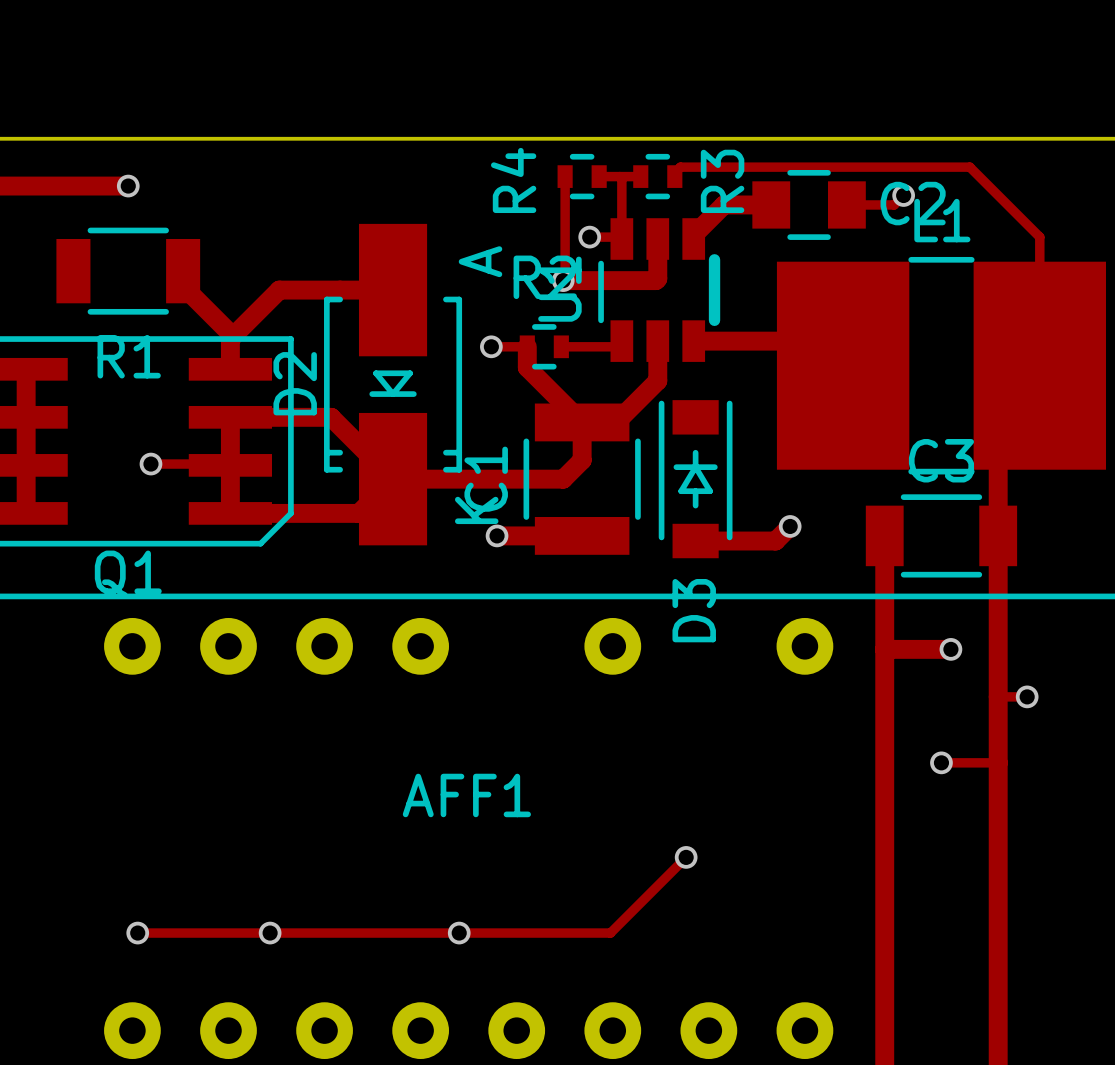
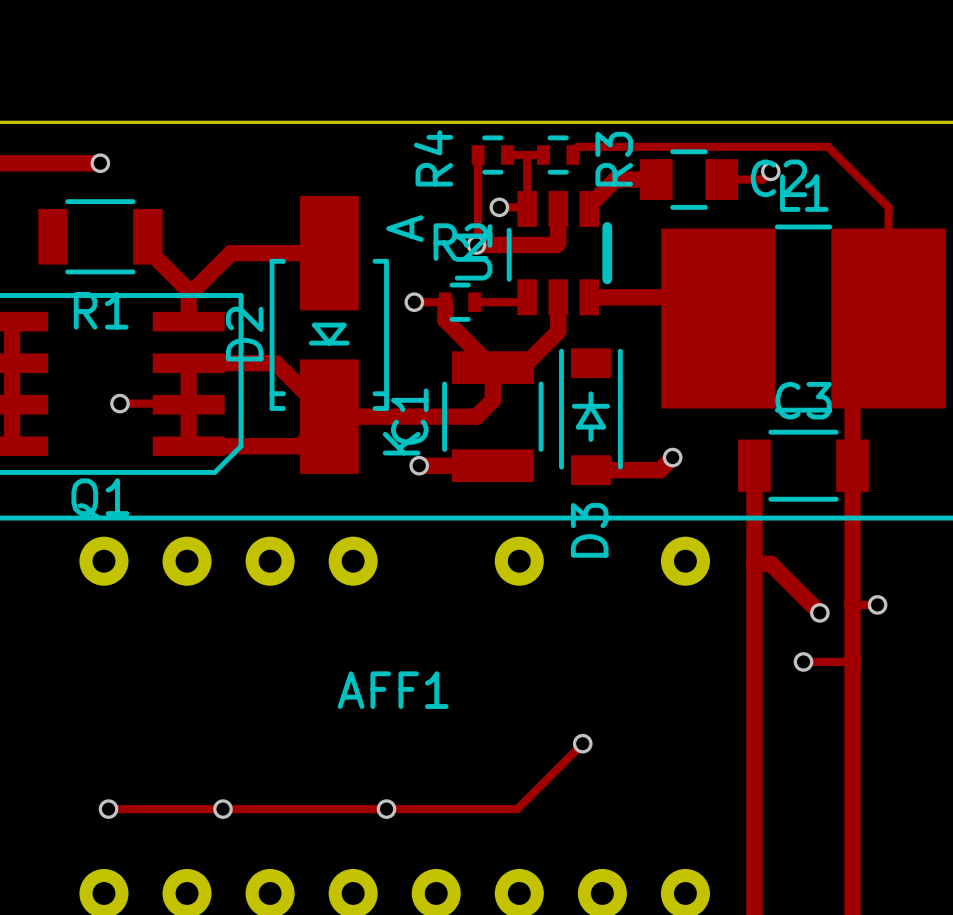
track: (903, 649) (950, 649) -> (770, 563) (819, 612)
via position: (950, 649) -> (819, 612)

